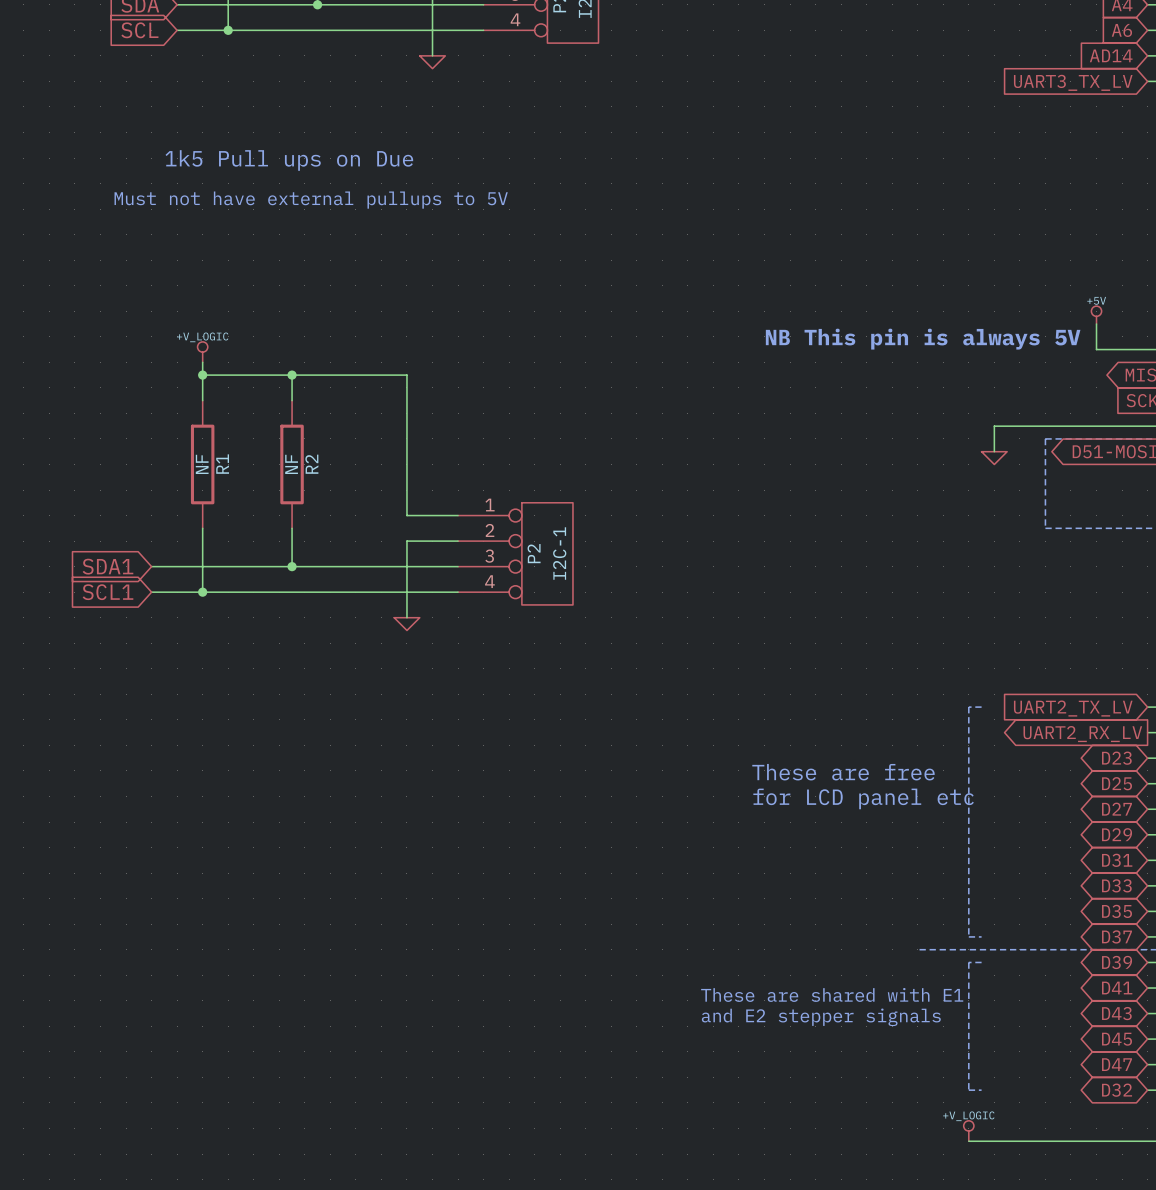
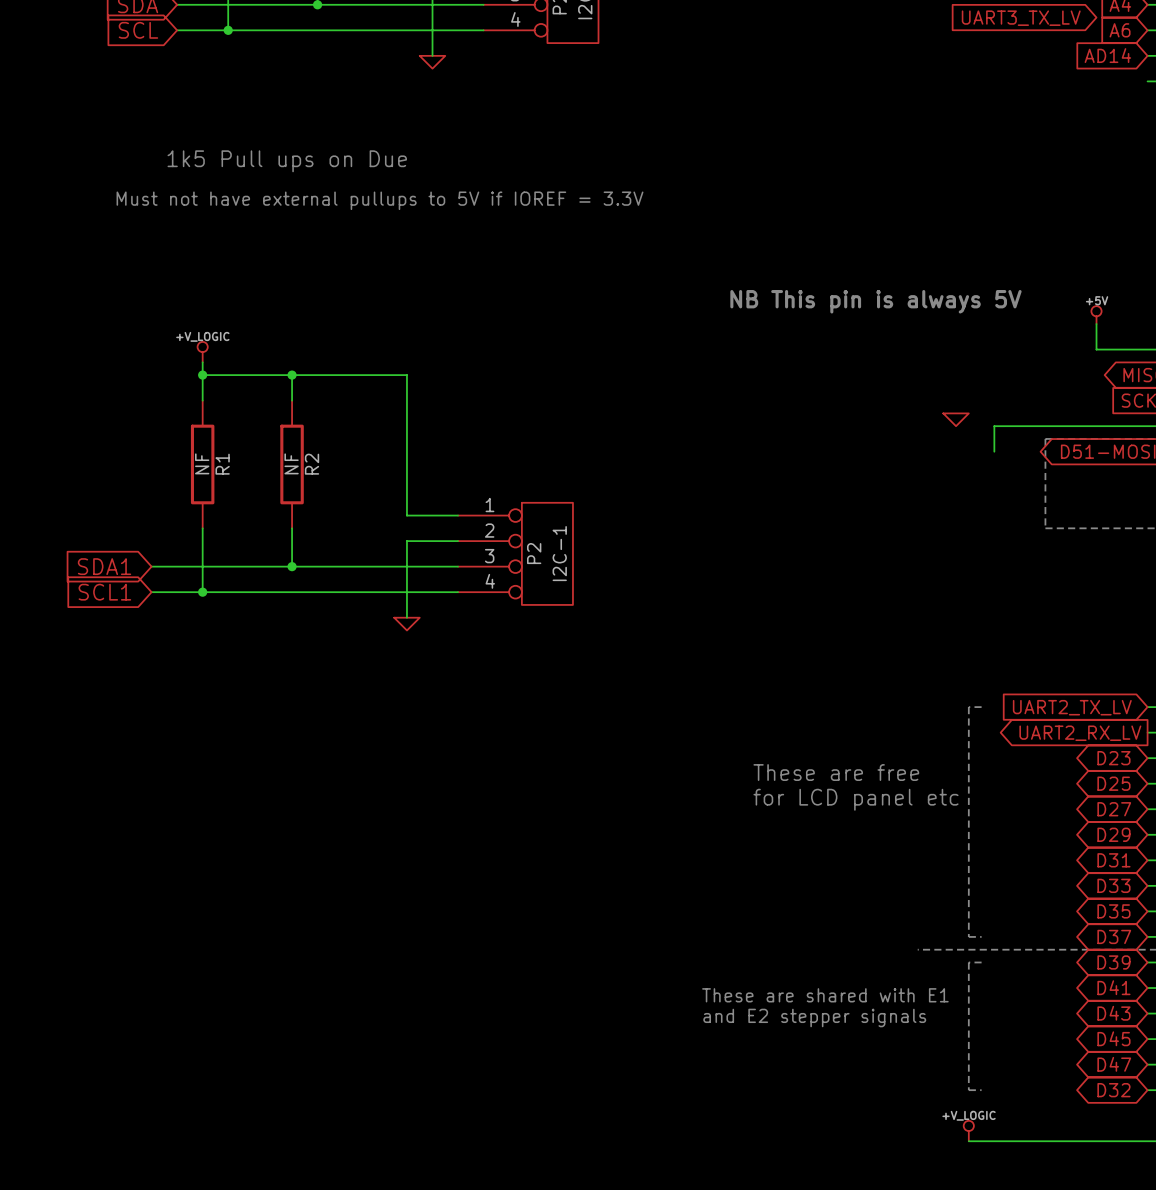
global label position: UART3_TX_LV (1073, 82) -> UART3_TX_LV (1021, 18)
text: Must not have external pullups to 5V (311, 200) -> Must not have external pullups to 5V if IOREF = 3.3V (380, 200)
text position: NB This pin is always 5V (923, 339) -> NB This pin is always 5V (875, 301)
power symbol position: (994, 458) -> (956, 419)

